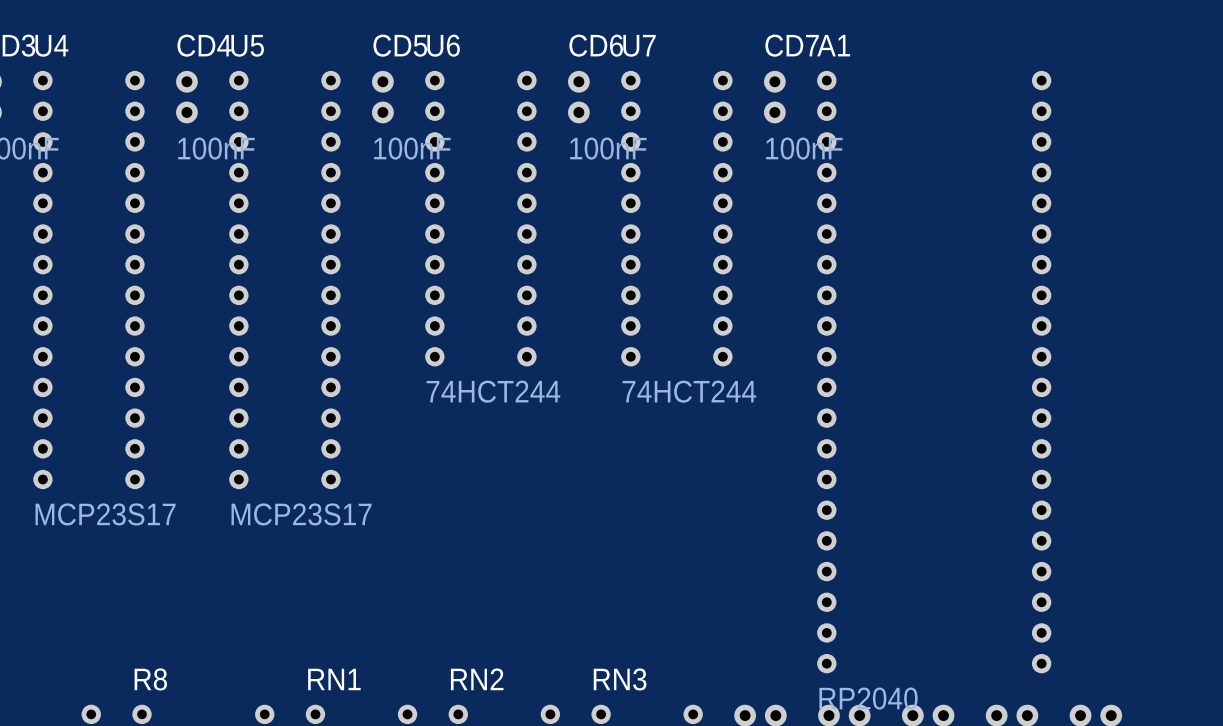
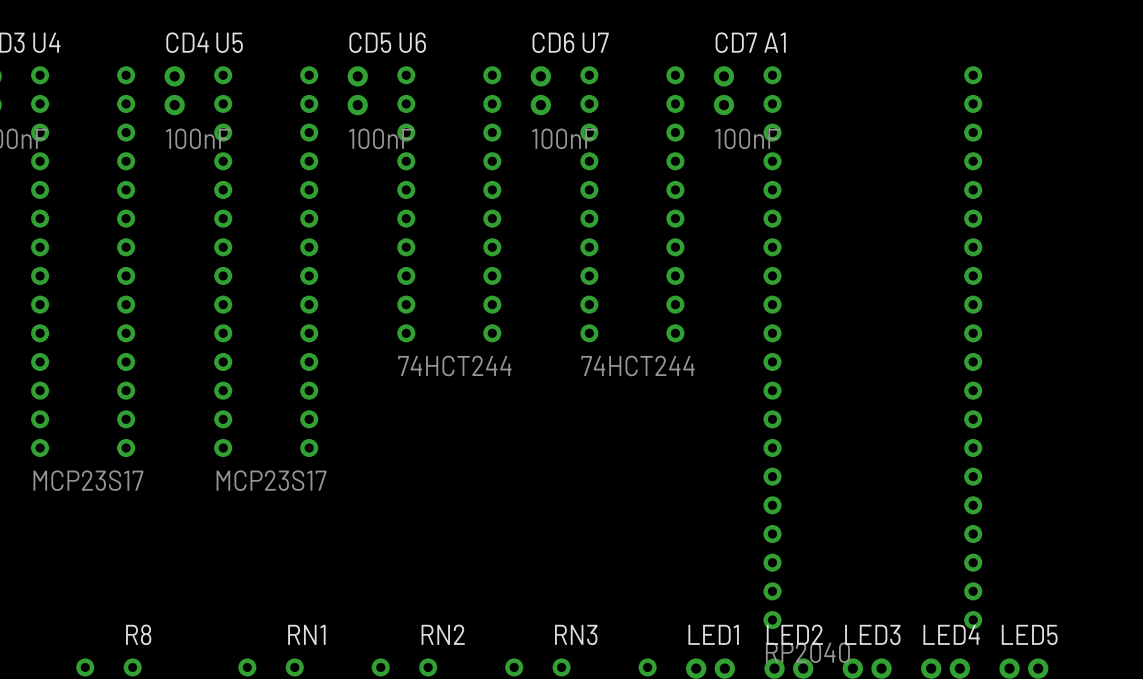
LED1 name: none -> LED1 (713, 634)
LED2 name: none -> LED2 (794, 634)
LED3 name: none -> LED3 (872, 634)
LED4 name: none -> LED4 (951, 634)
LED5 name: none -> LED5 (1029, 634)

